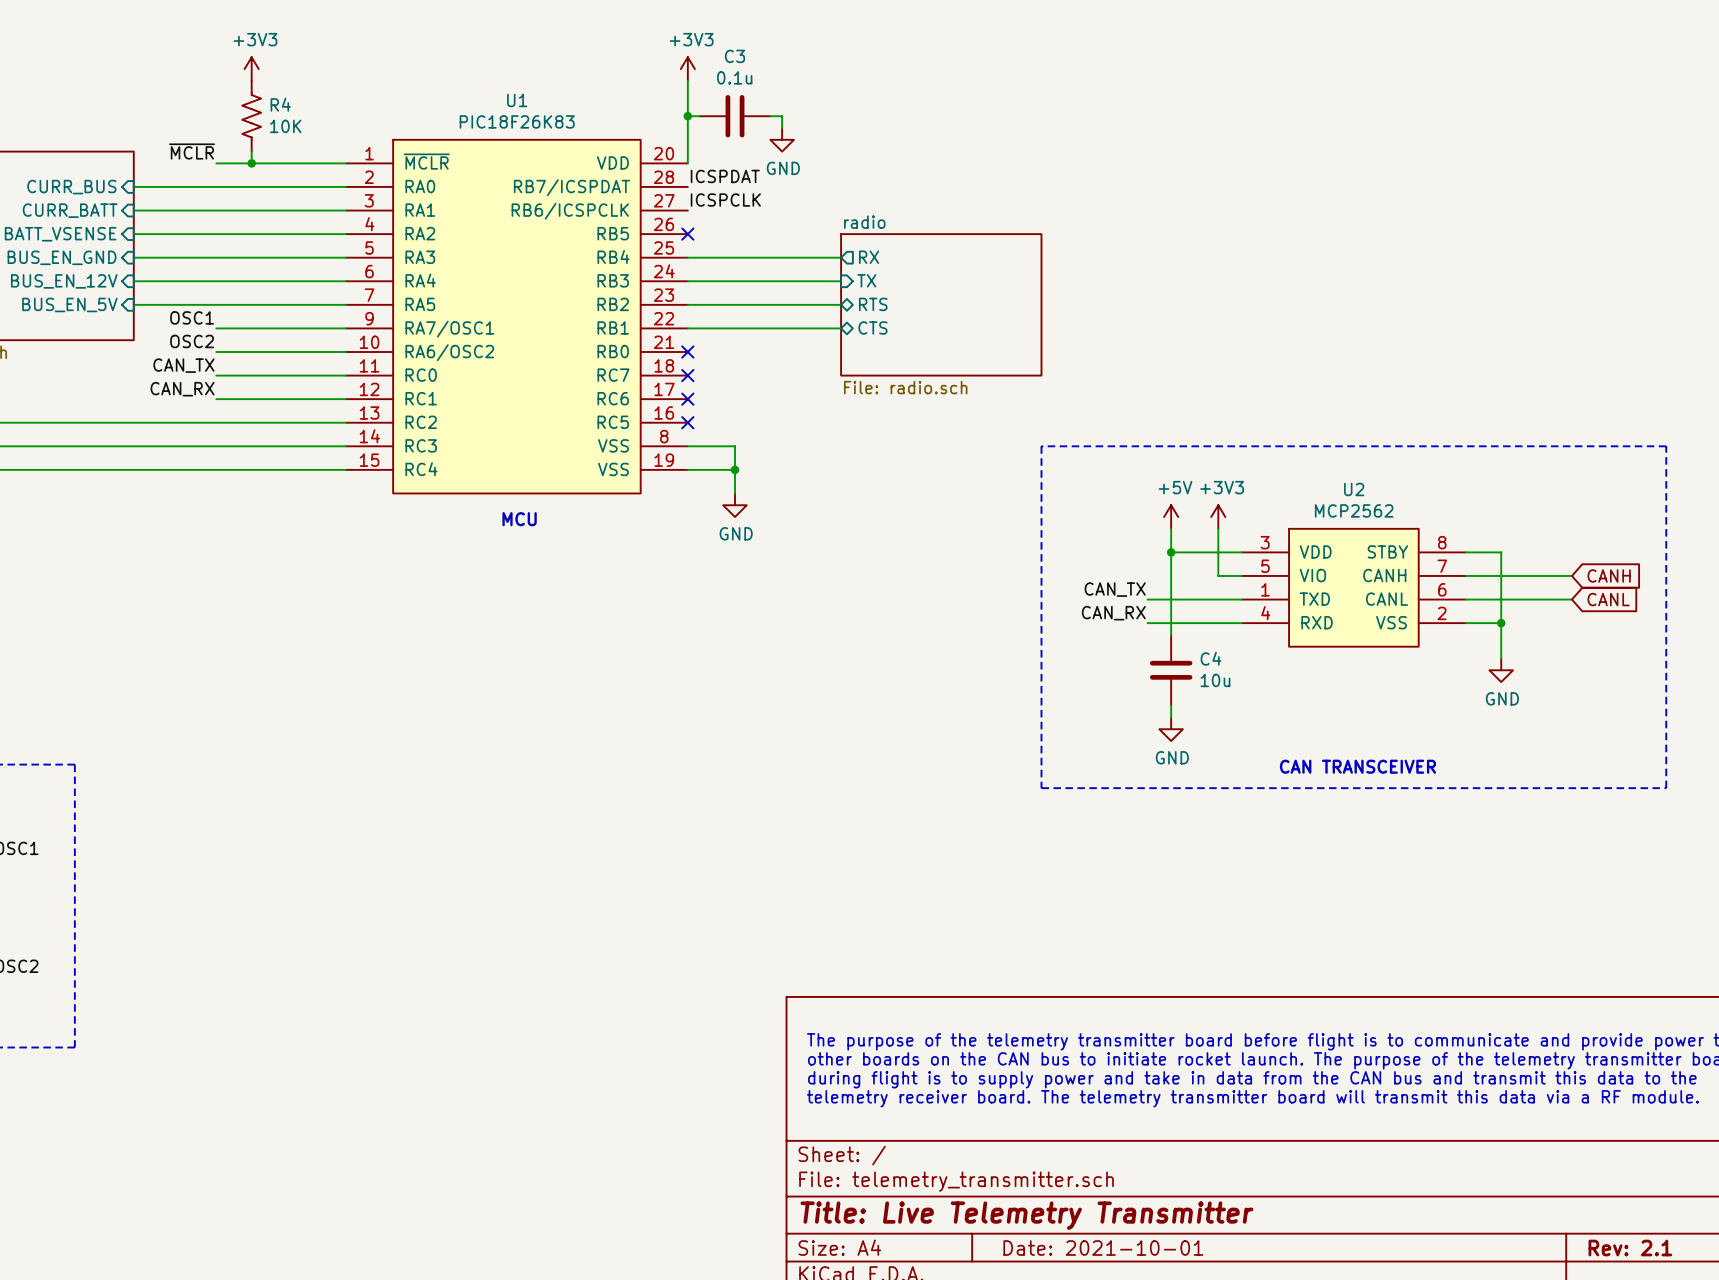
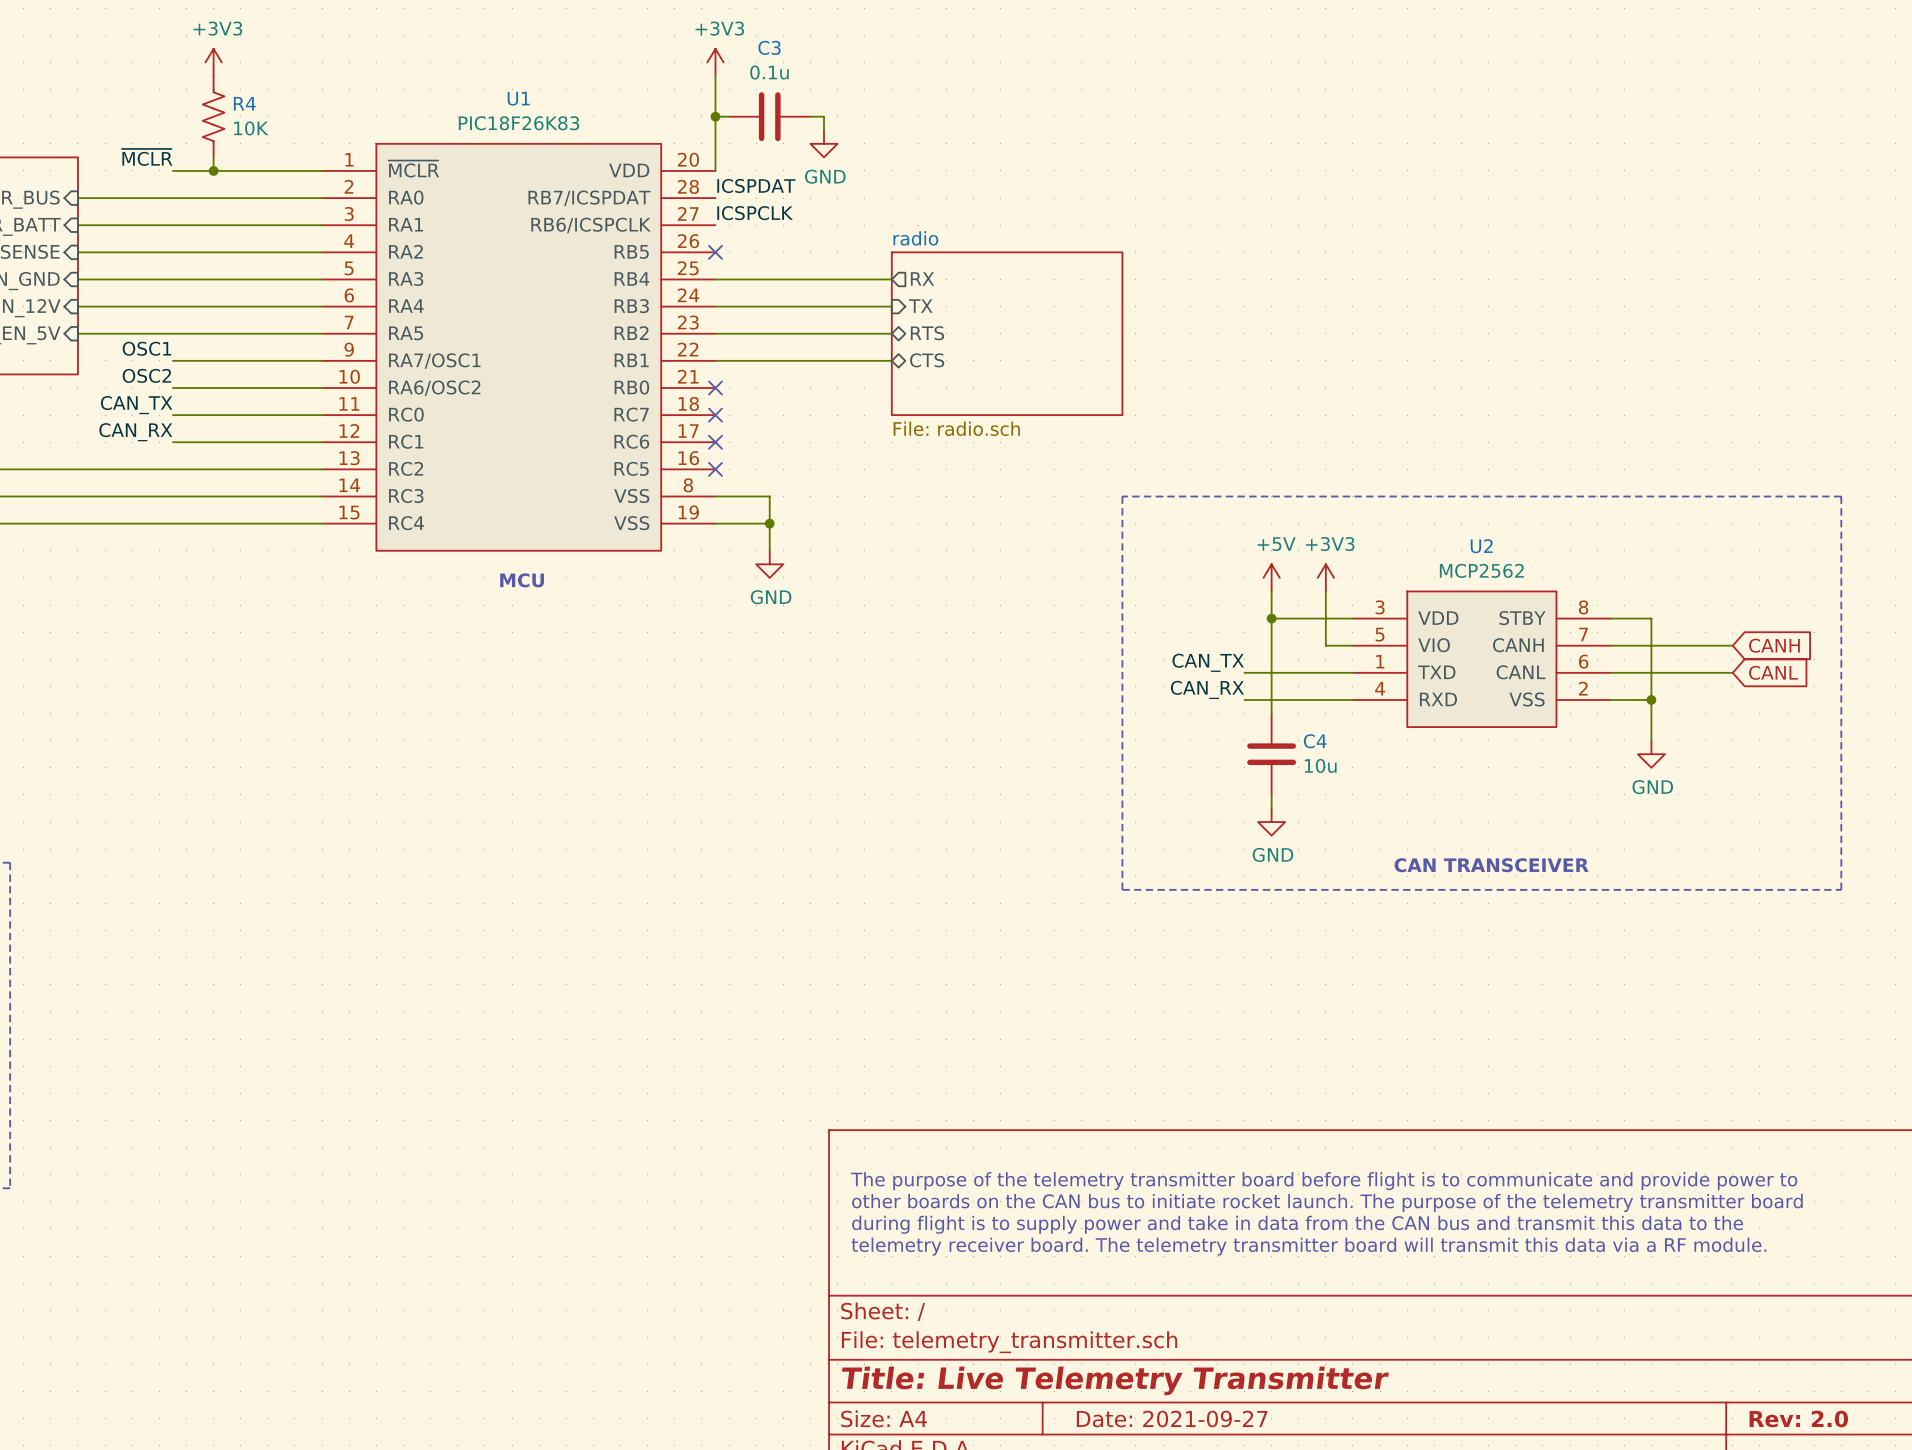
title block: Date: 2021-10-01 (1103, 1248) -> Date: 2021-09-27 (1172, 1418)
title block: Rev: 2.1 (1630, 1248) -> Rev: 2.0 (1798, 1418)

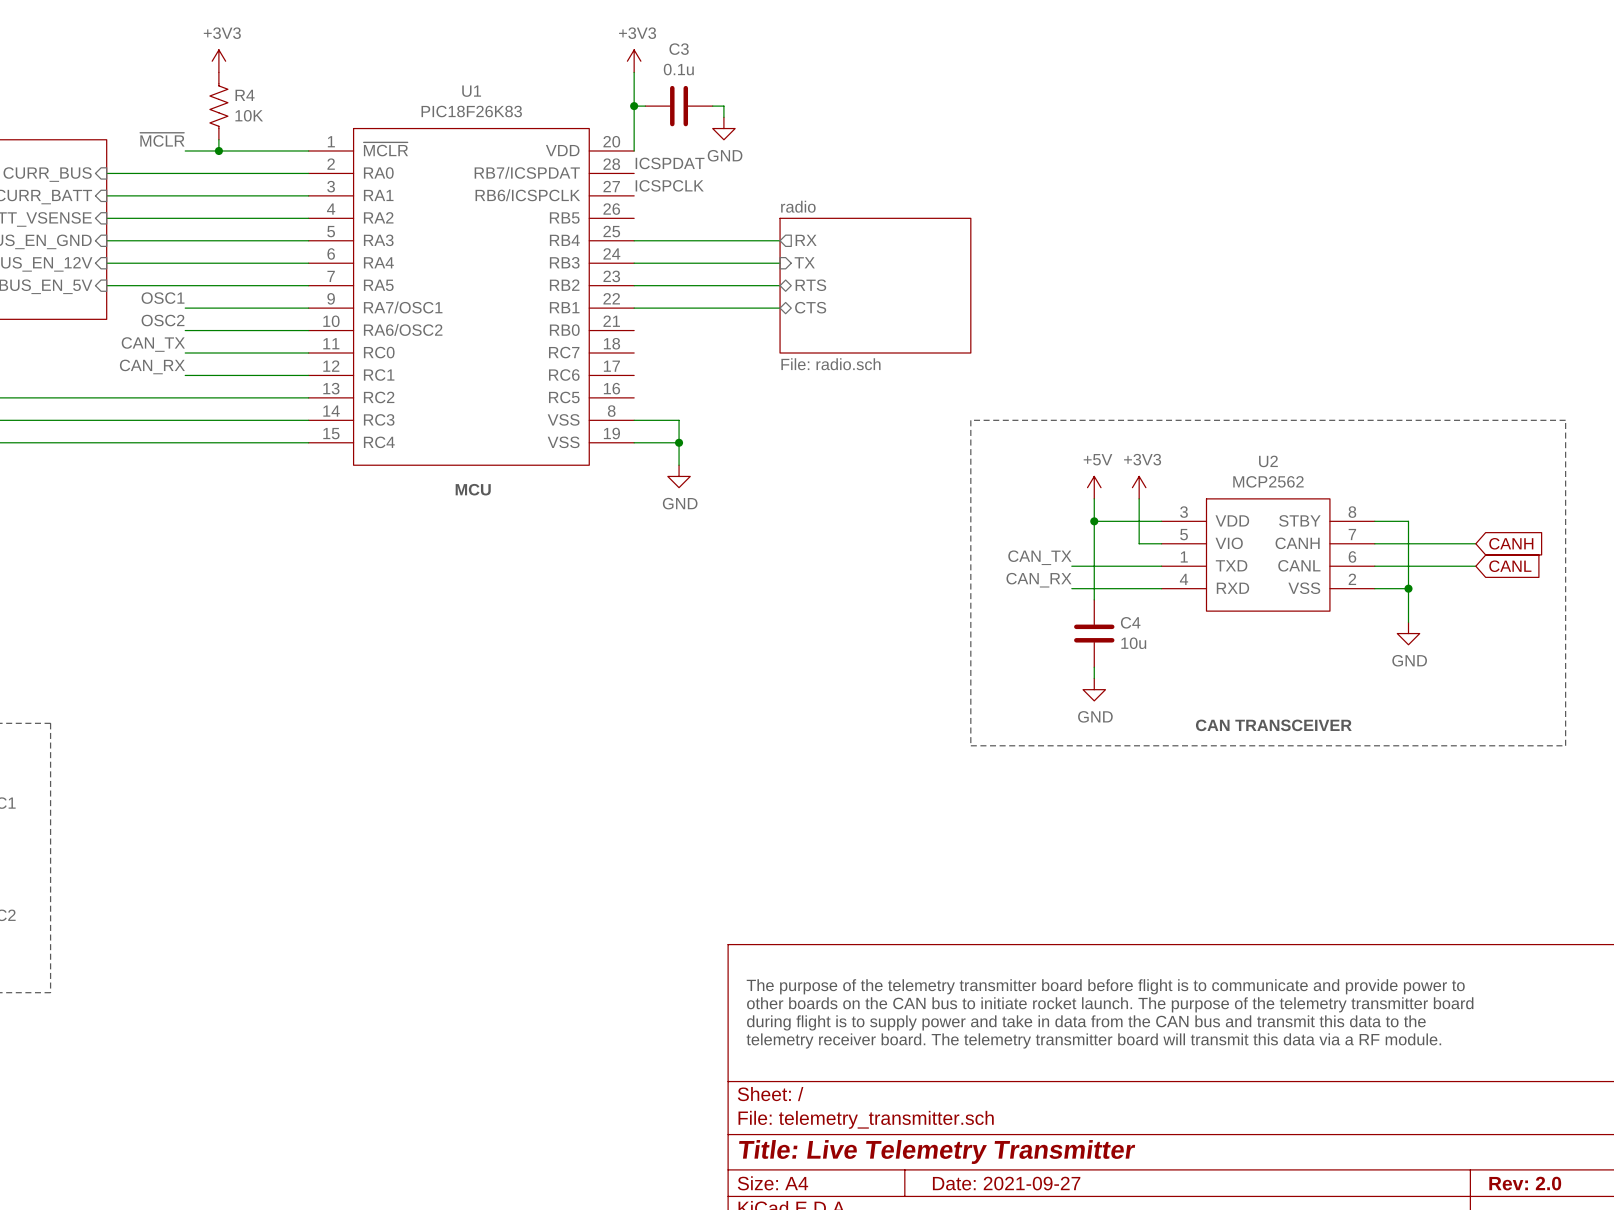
no-connect mark: (715, 252) -> none
no-connect mark: (715, 387) -> none
no-connect mark: (715, 415) -> none
no-connect mark: (715, 442) -> none
no-connect mark: (715, 469) -> none

